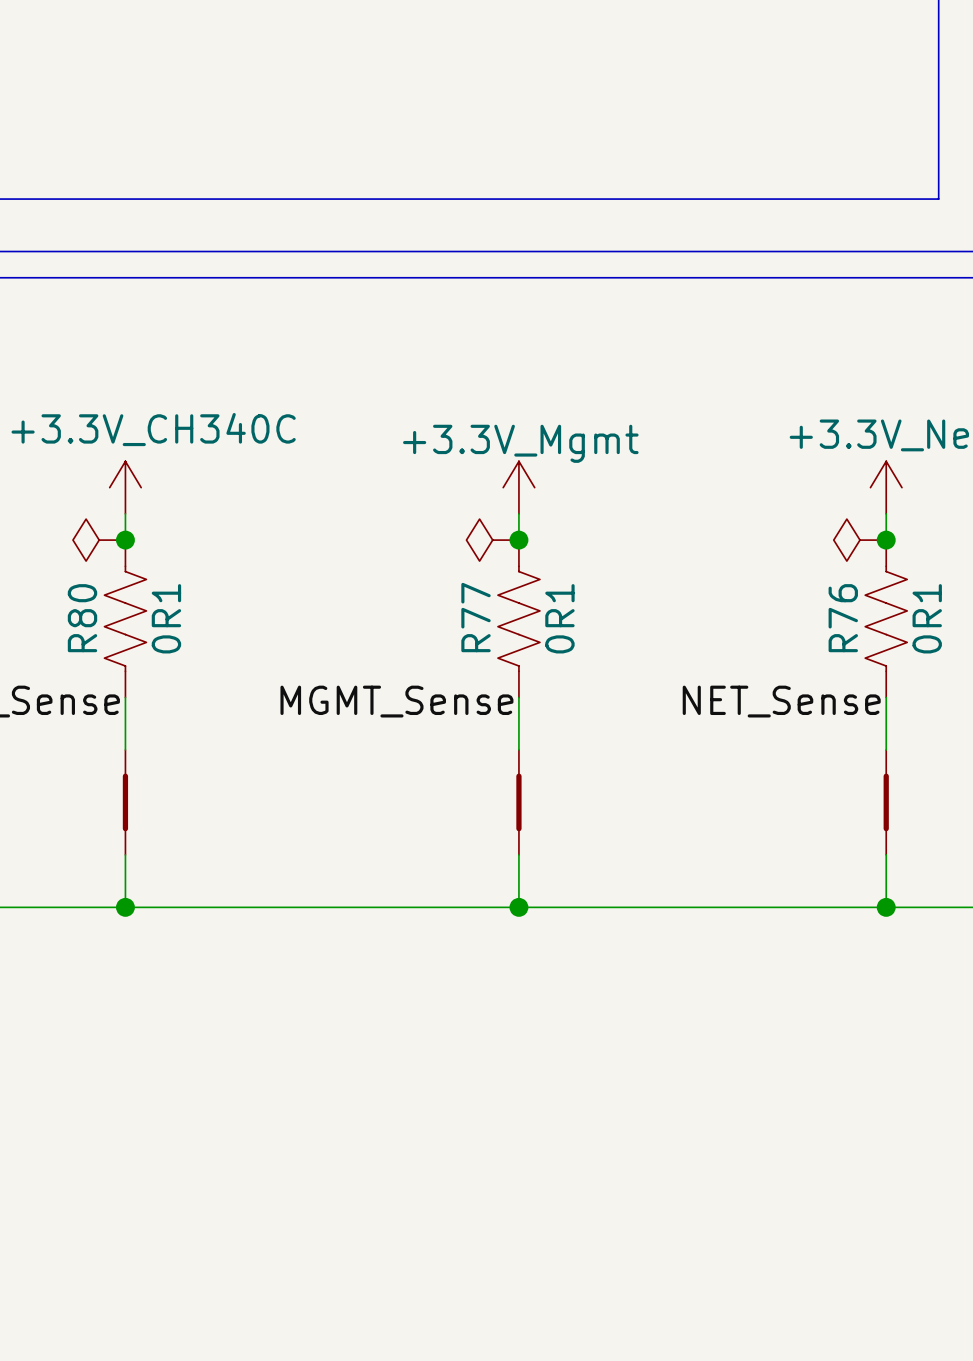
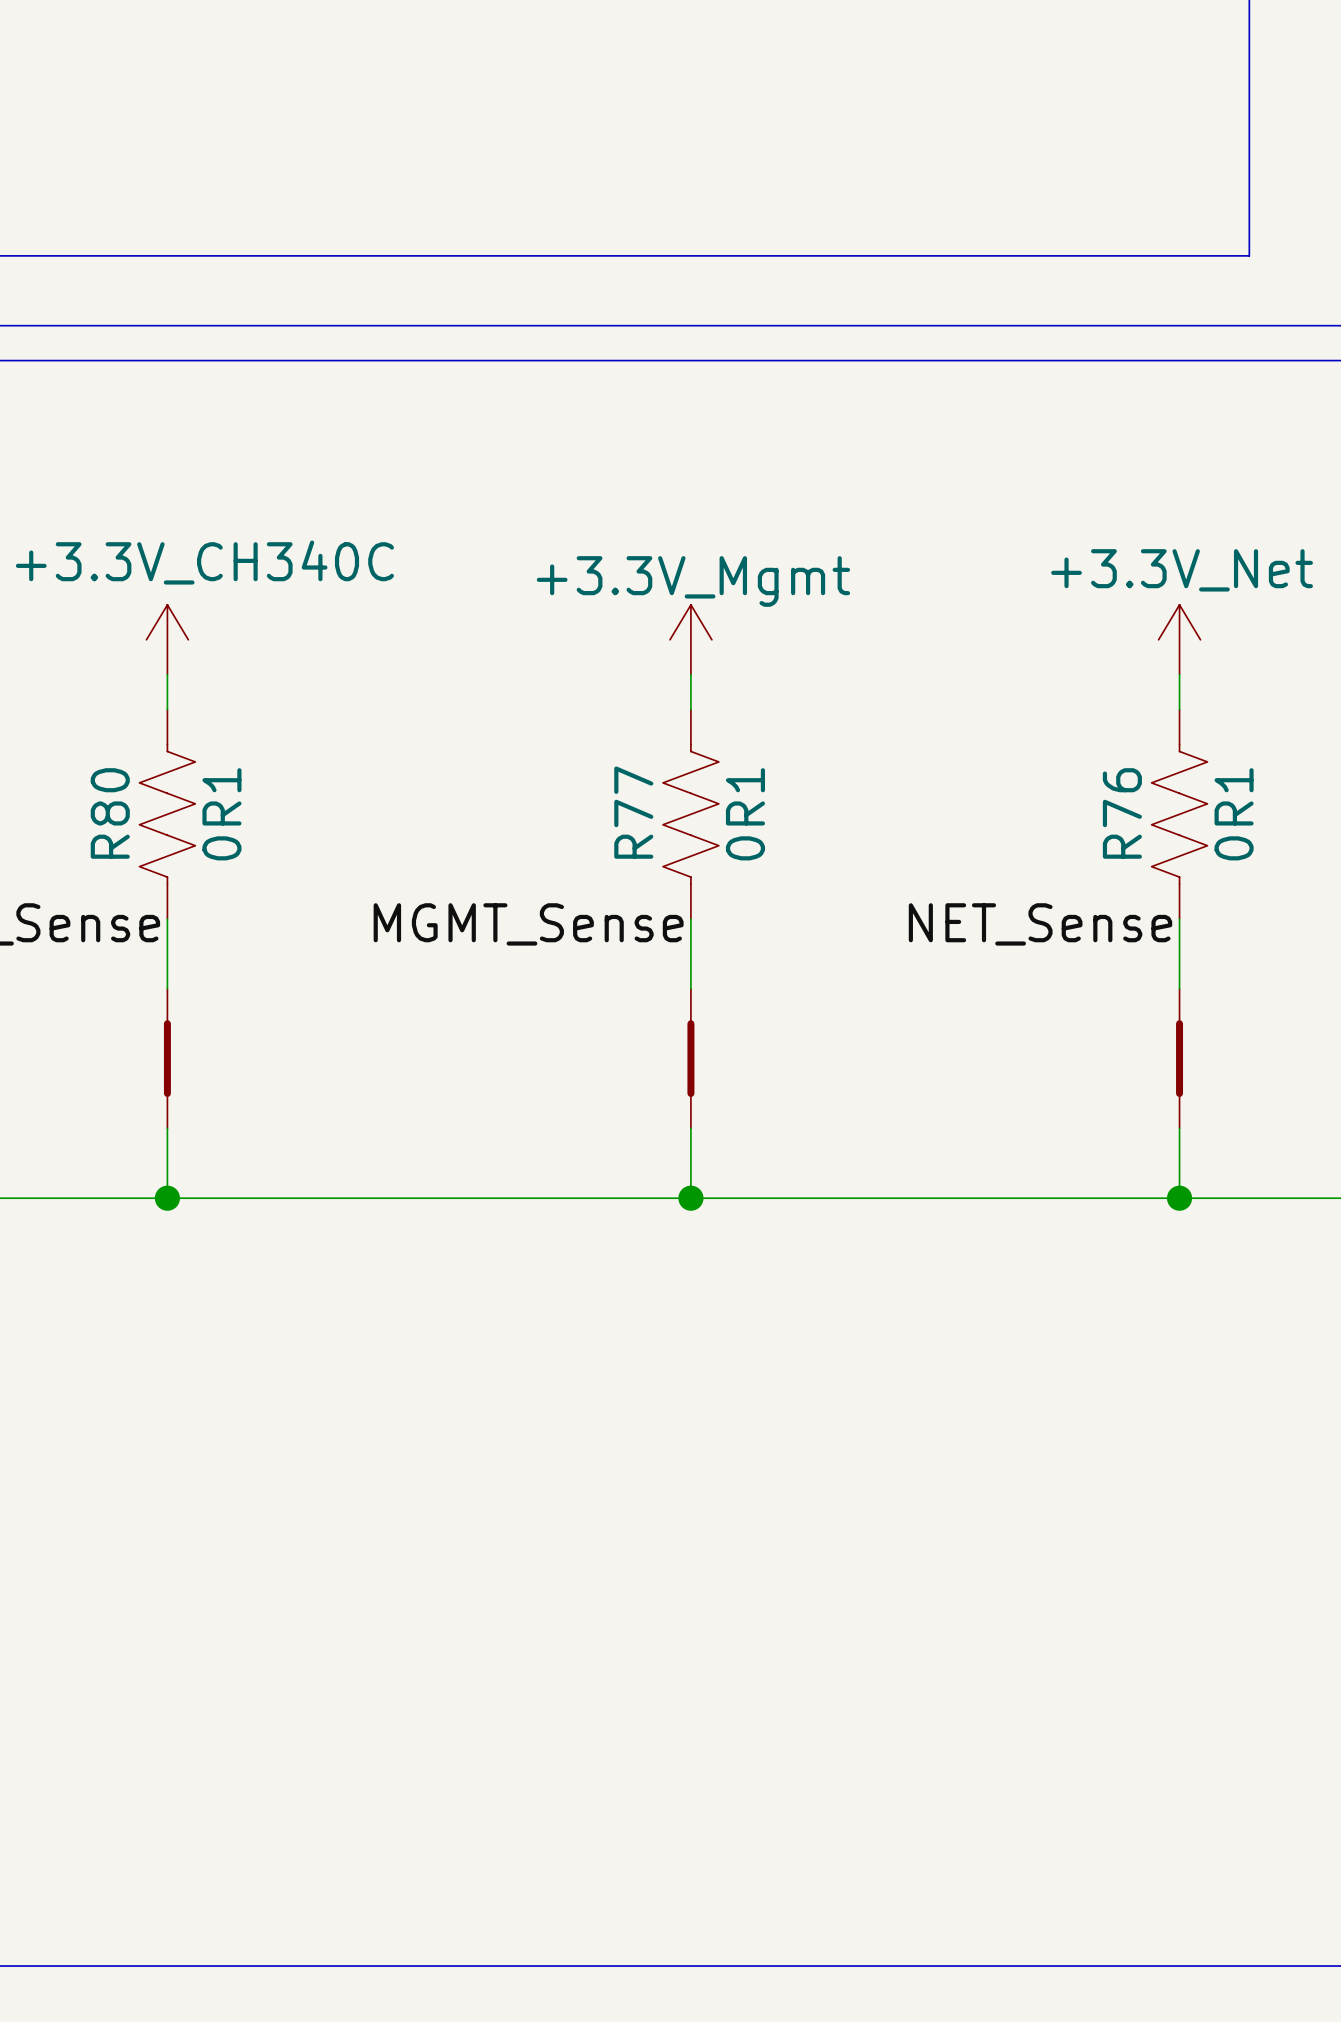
power symbol: (99, 540) -> none
junction: (125, 540) -> none
power symbol: (492, 540) -> none
junction: (518, 540) -> none
power symbol: (859, 540) -> none
junction: (886, 540) -> none

